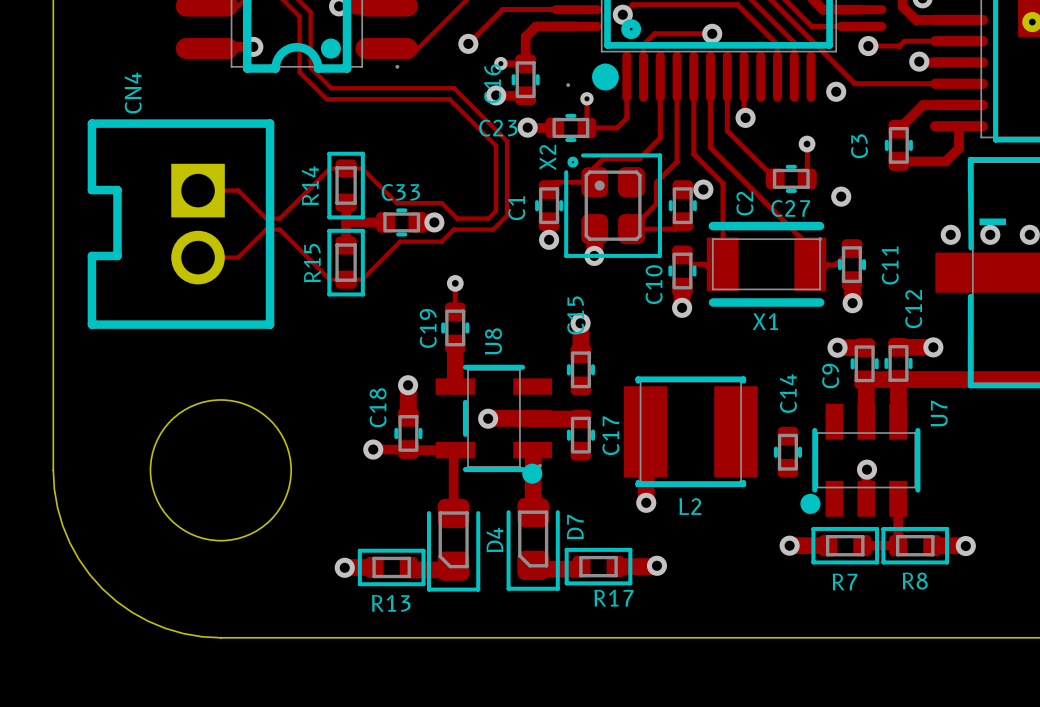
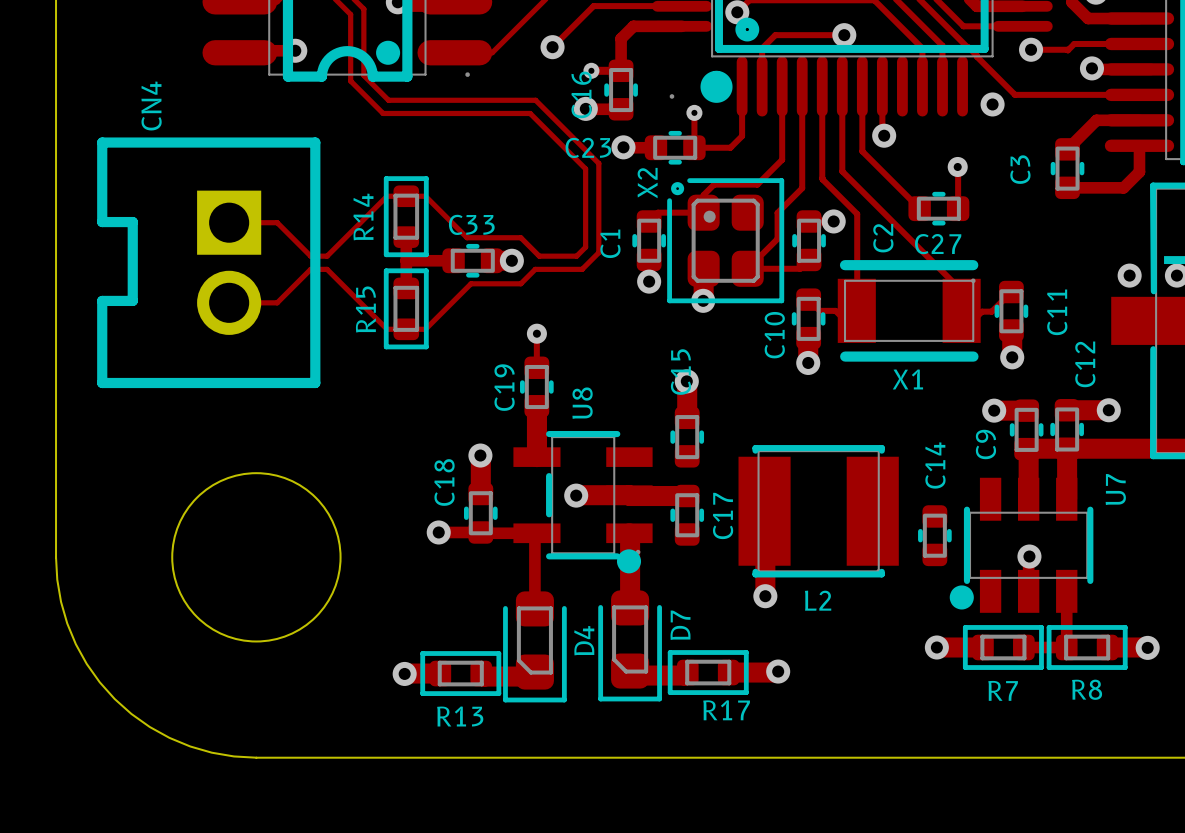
via: (841, 196) -> none

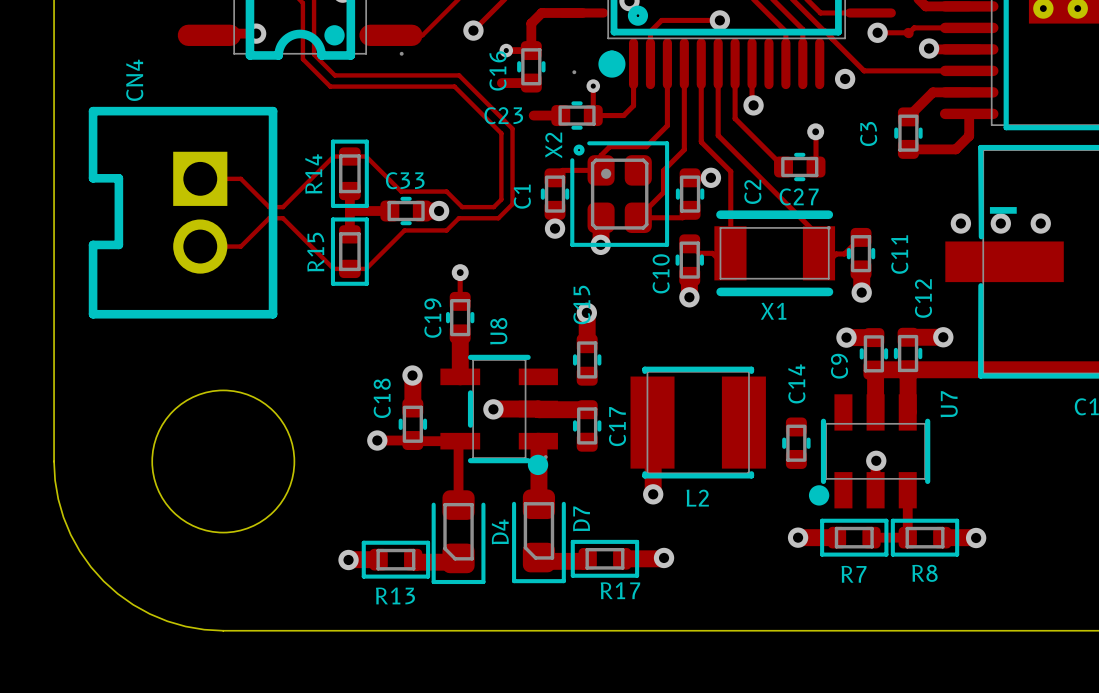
via: (585, 108) -> none
via: (623, 147) -> none

